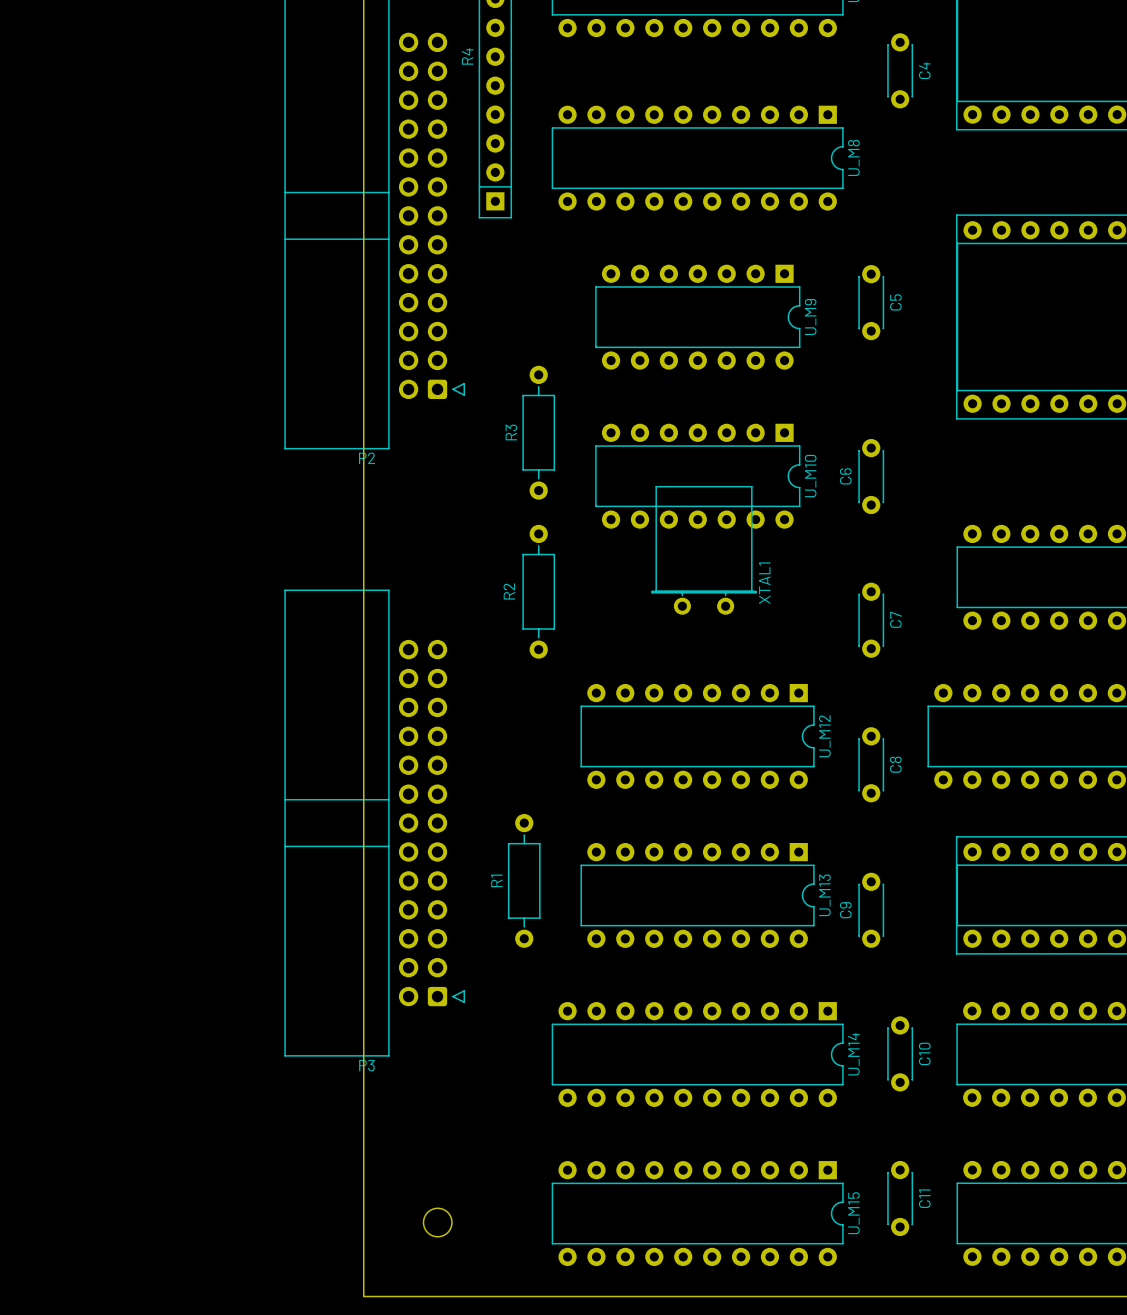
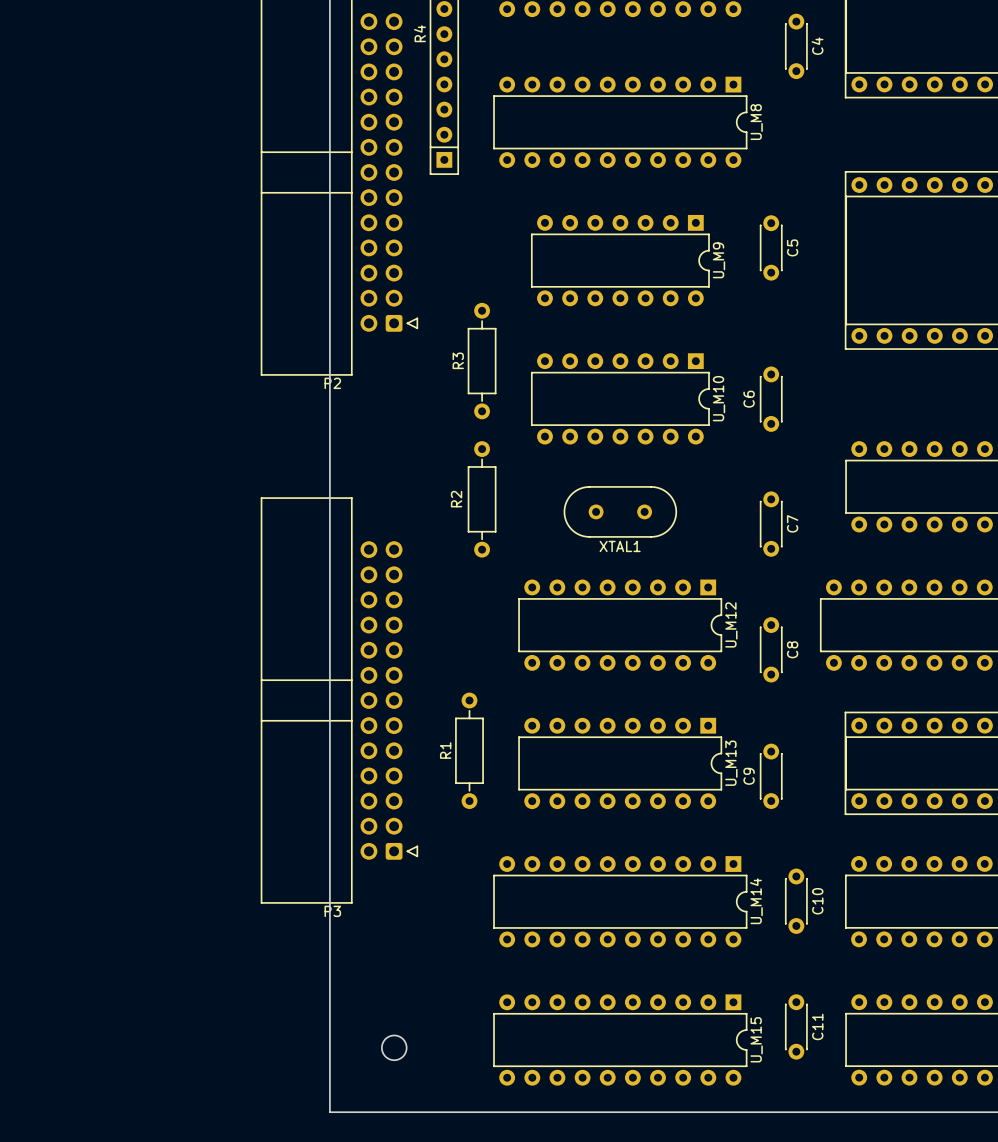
XTAL1 footprint: [651, 486, 757, 615] -> [563, 486, 677, 538]
XTAL1 name position: XTAL1 (764, 583) -> XTAL1 (620, 546)

